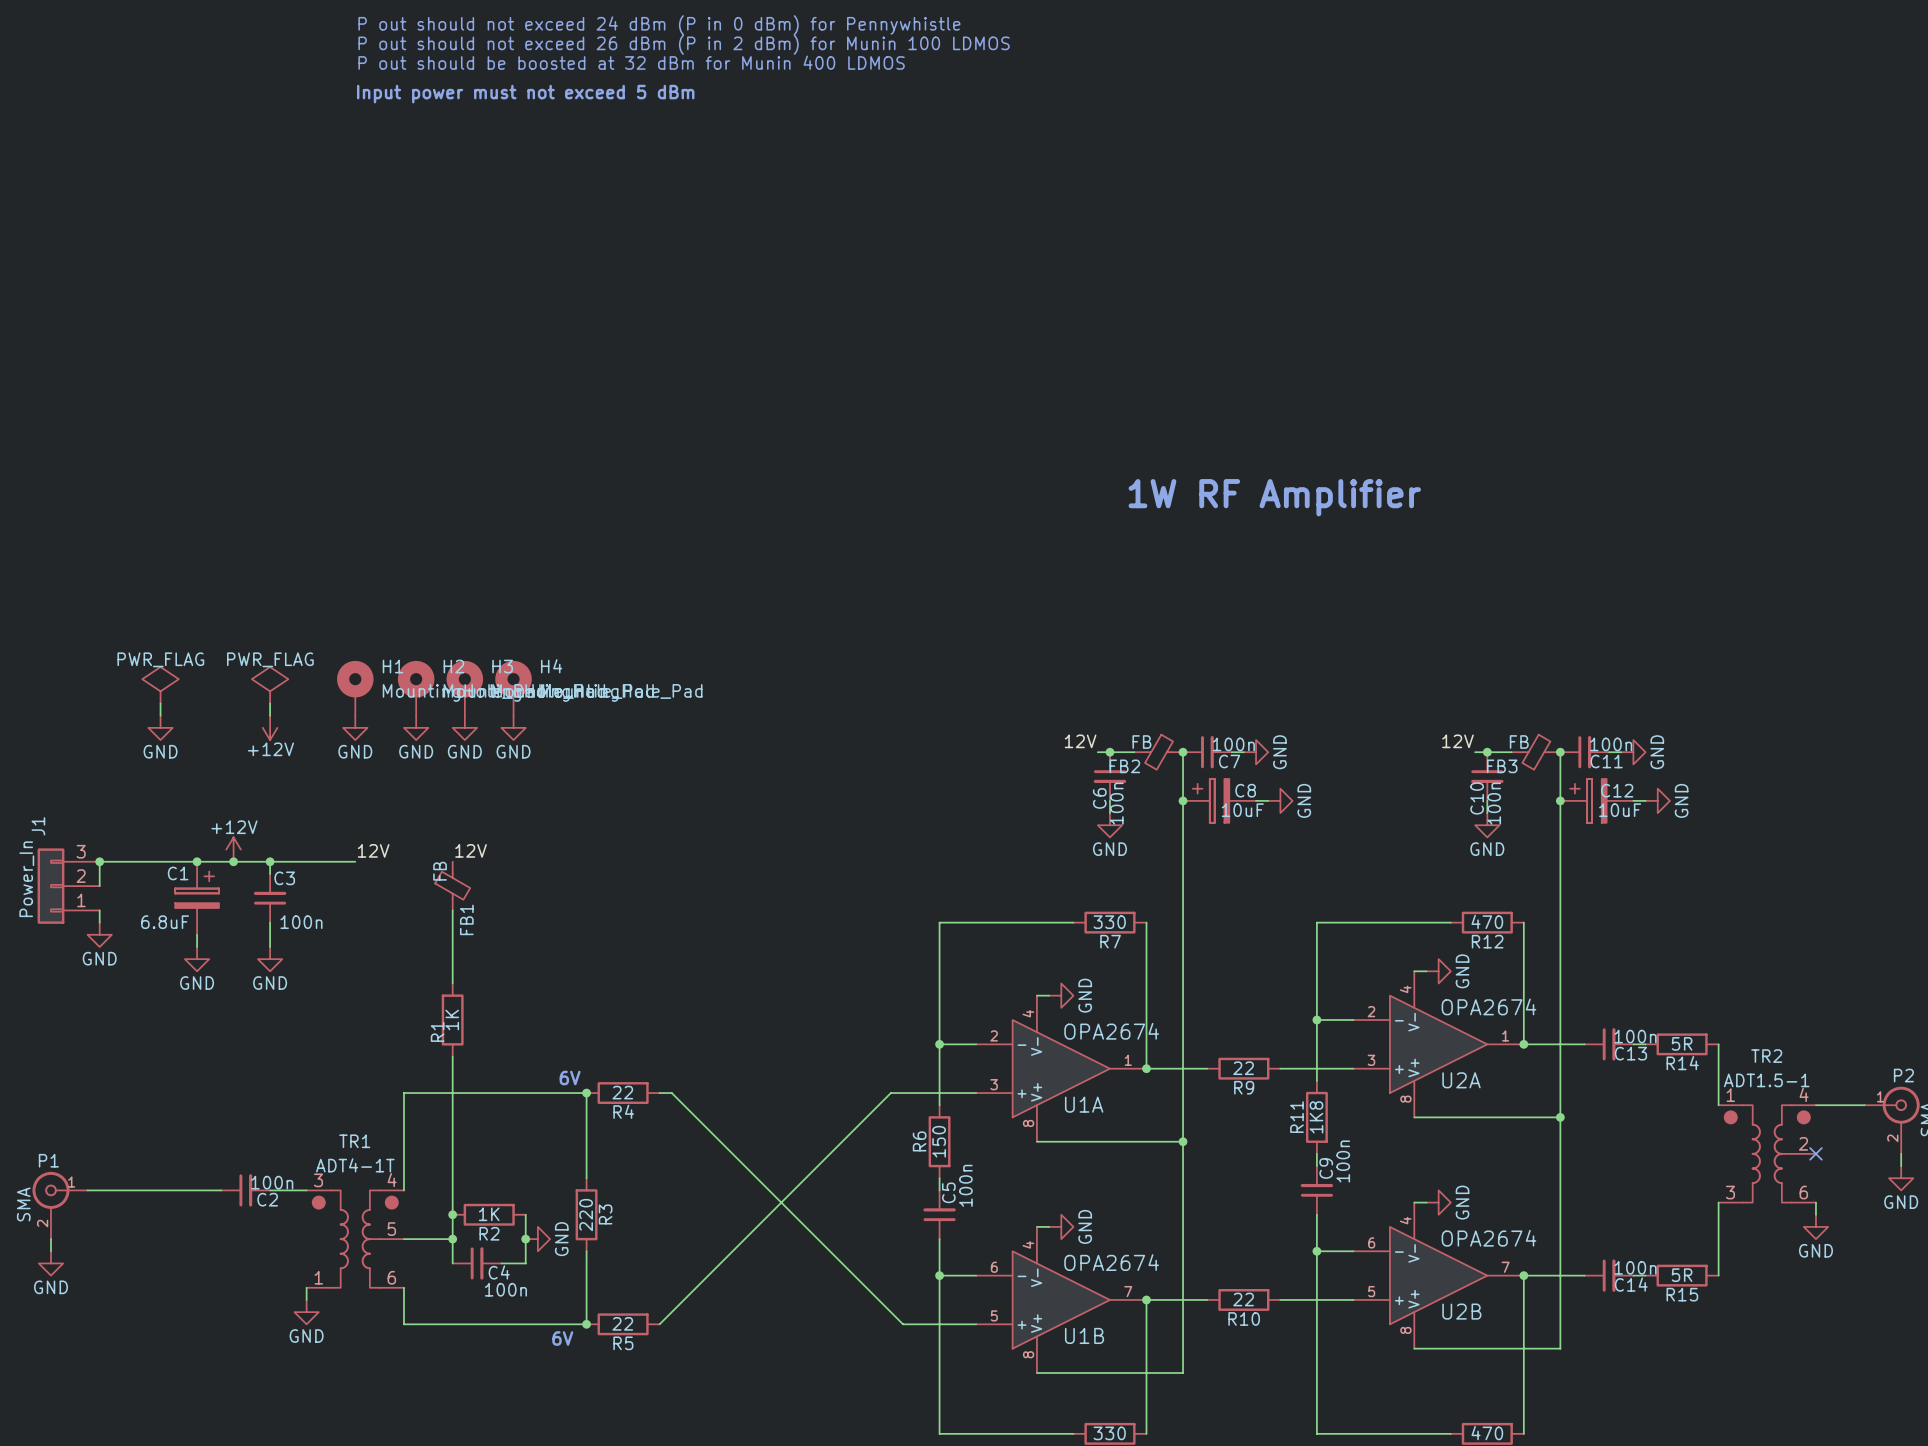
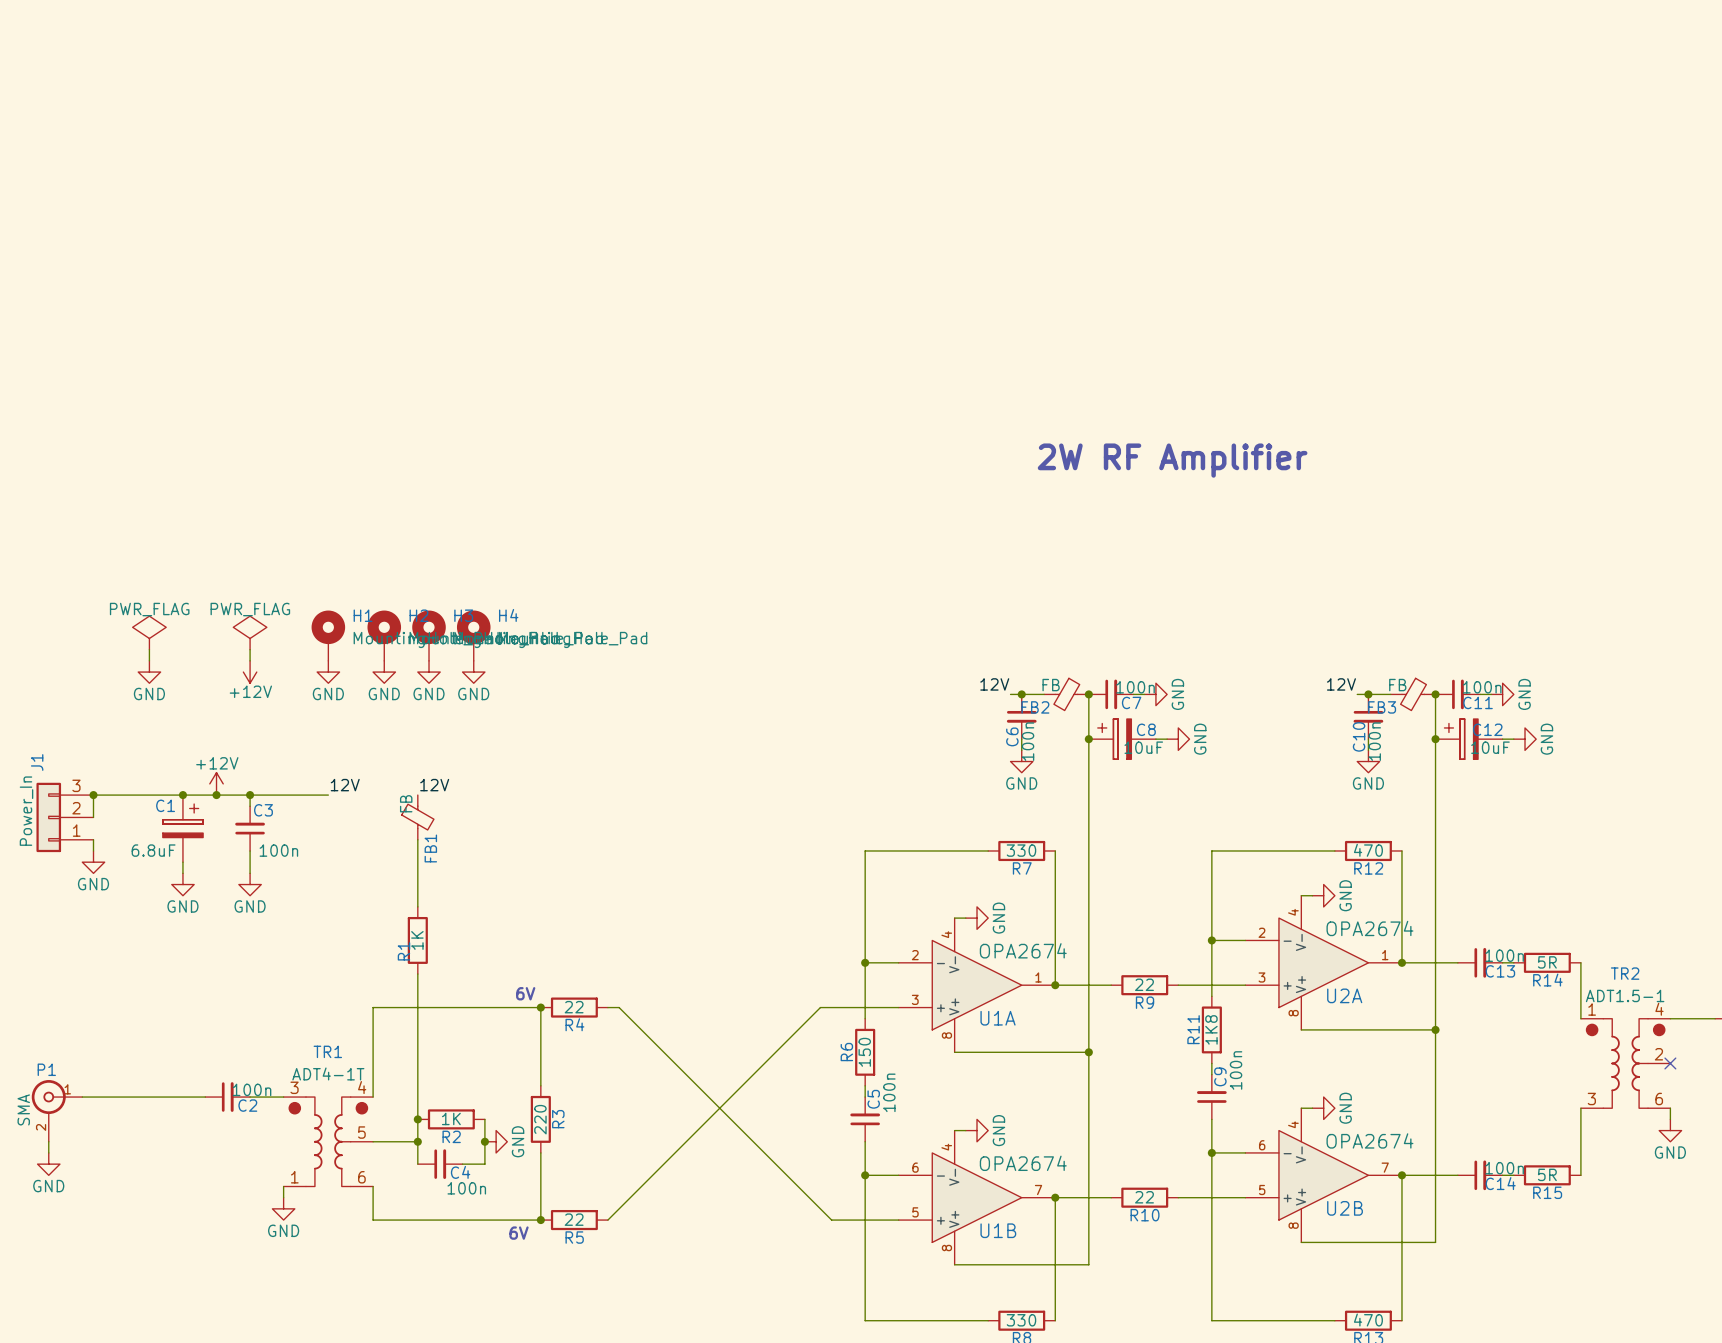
text: P out should not exceed 24 dBm (P in 0 dBm) for Pennywhistle (659, 25) -> none
text: P out should not exceed 26 dBm (P in 2 dBm) for Munin 100 LDMOS (684, 44) -> none
text: P out should be boosted at 32 dBm for Munin 400 LDMOS (631, 62) -> none
text: Input power must not exceed 5 dBm (525, 94) -> none
text: 1W RF Amplifier (1274, 497) -> 2W RF Amplifier (1172, 460)

